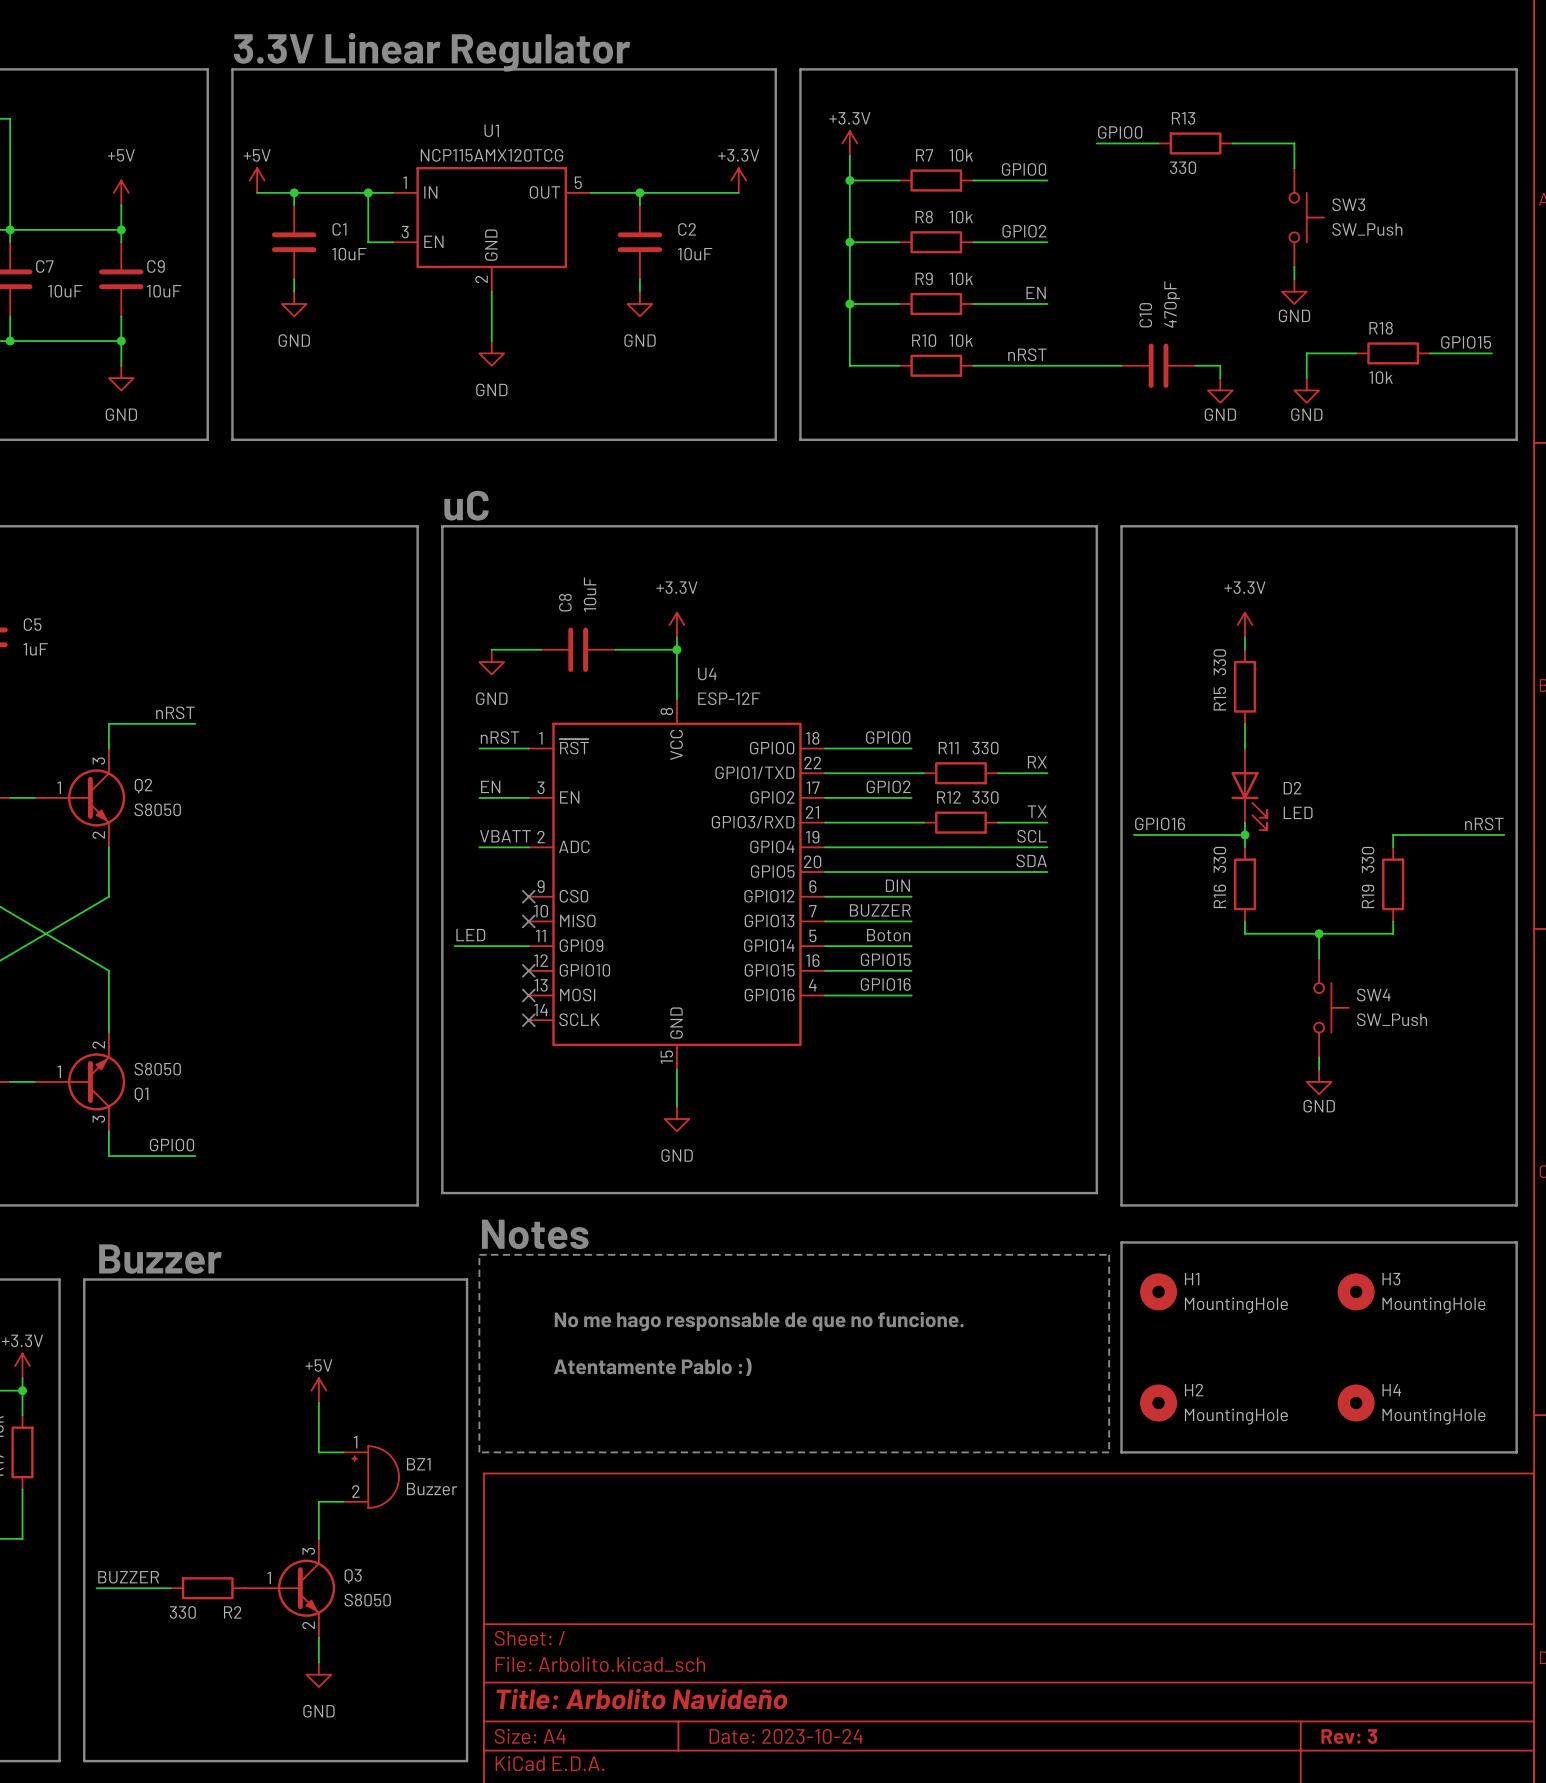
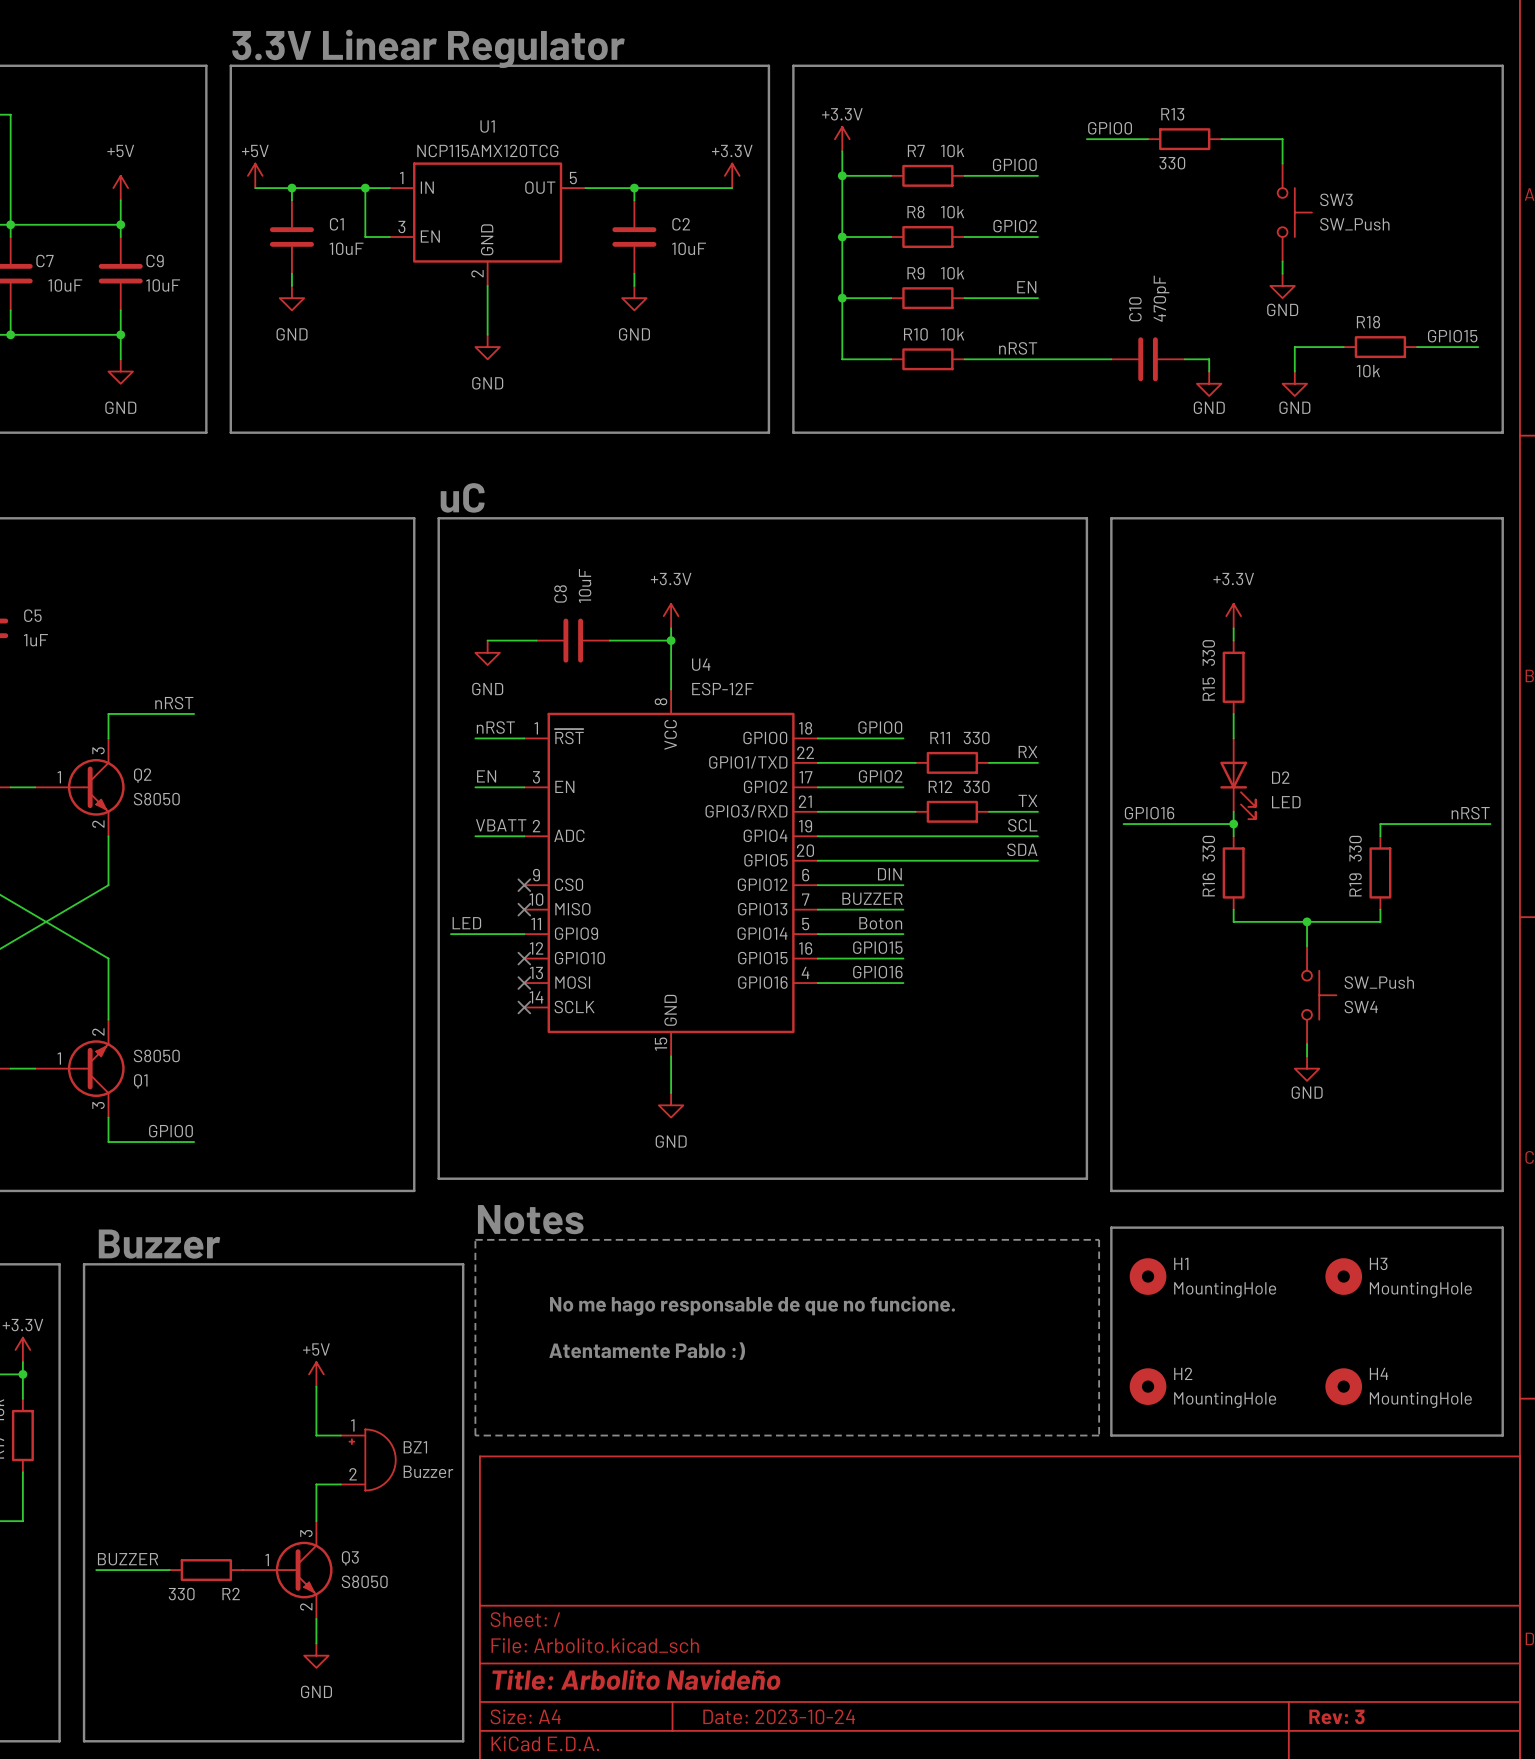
SW4 name position: SW4 (1373, 995) -> SW4 (1361, 1007)
SW4 value position: SW_Push (1392, 1019) -> SW_Push (1379, 982)

